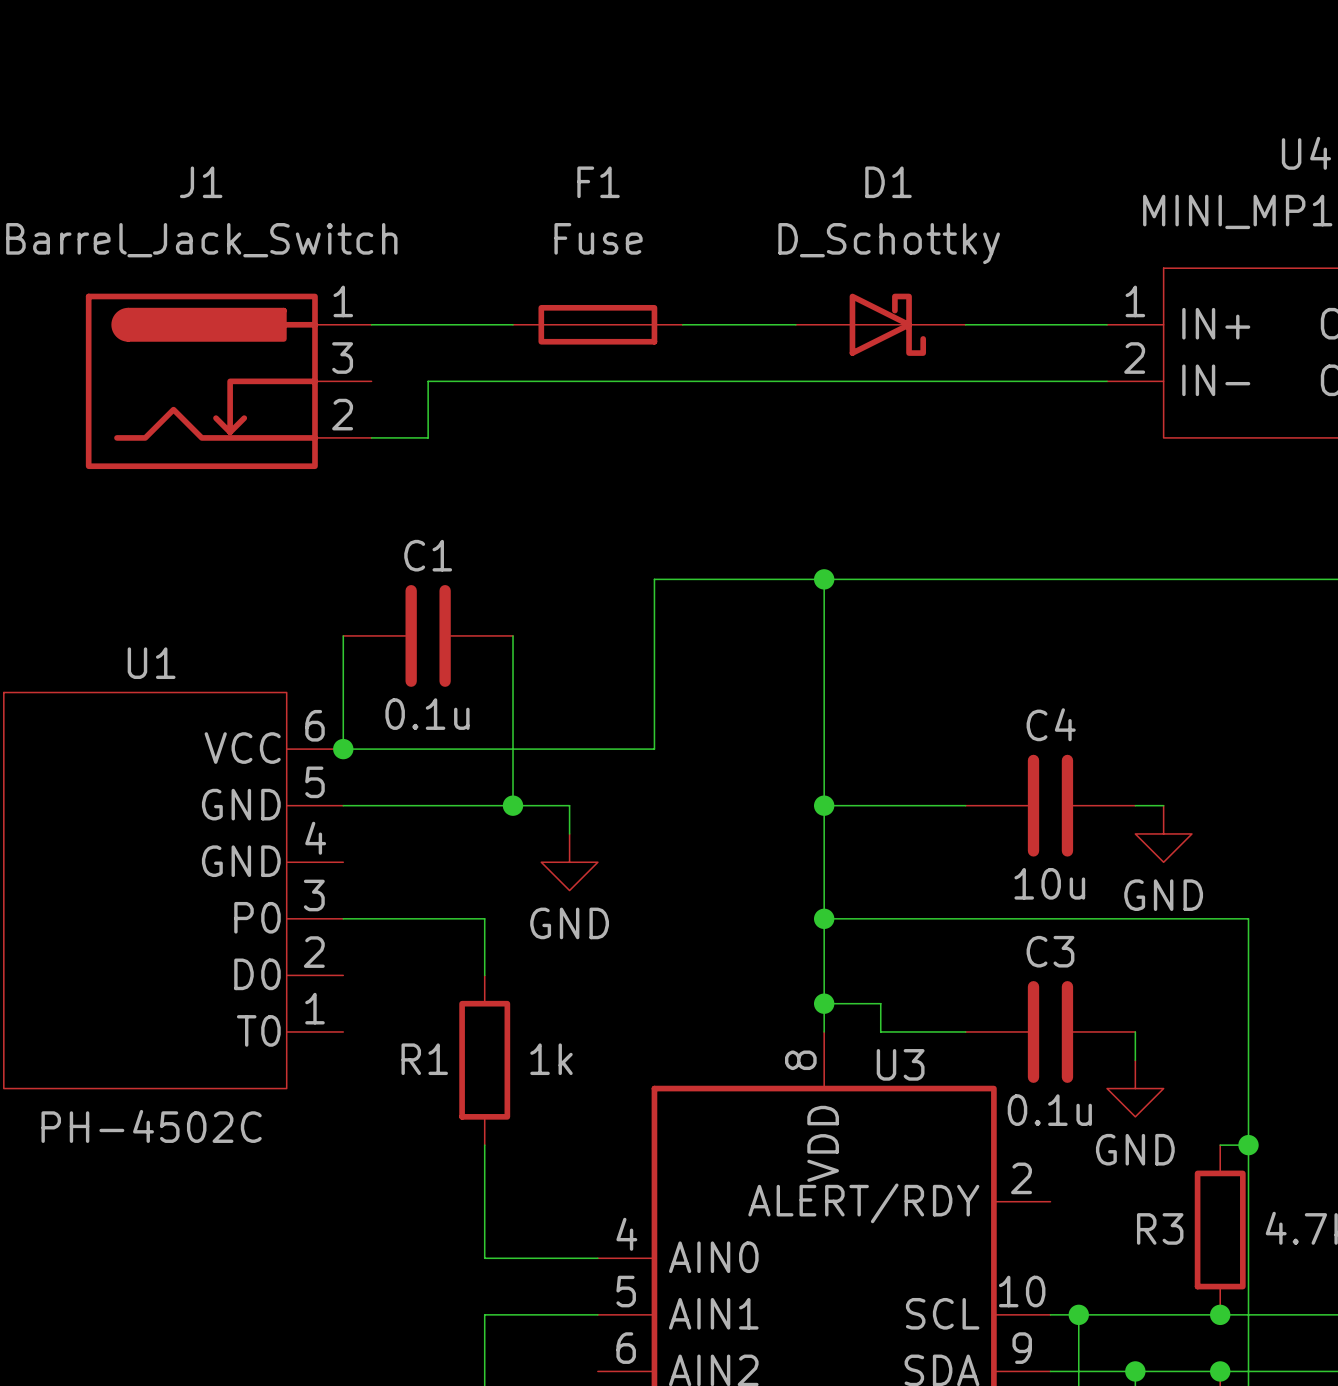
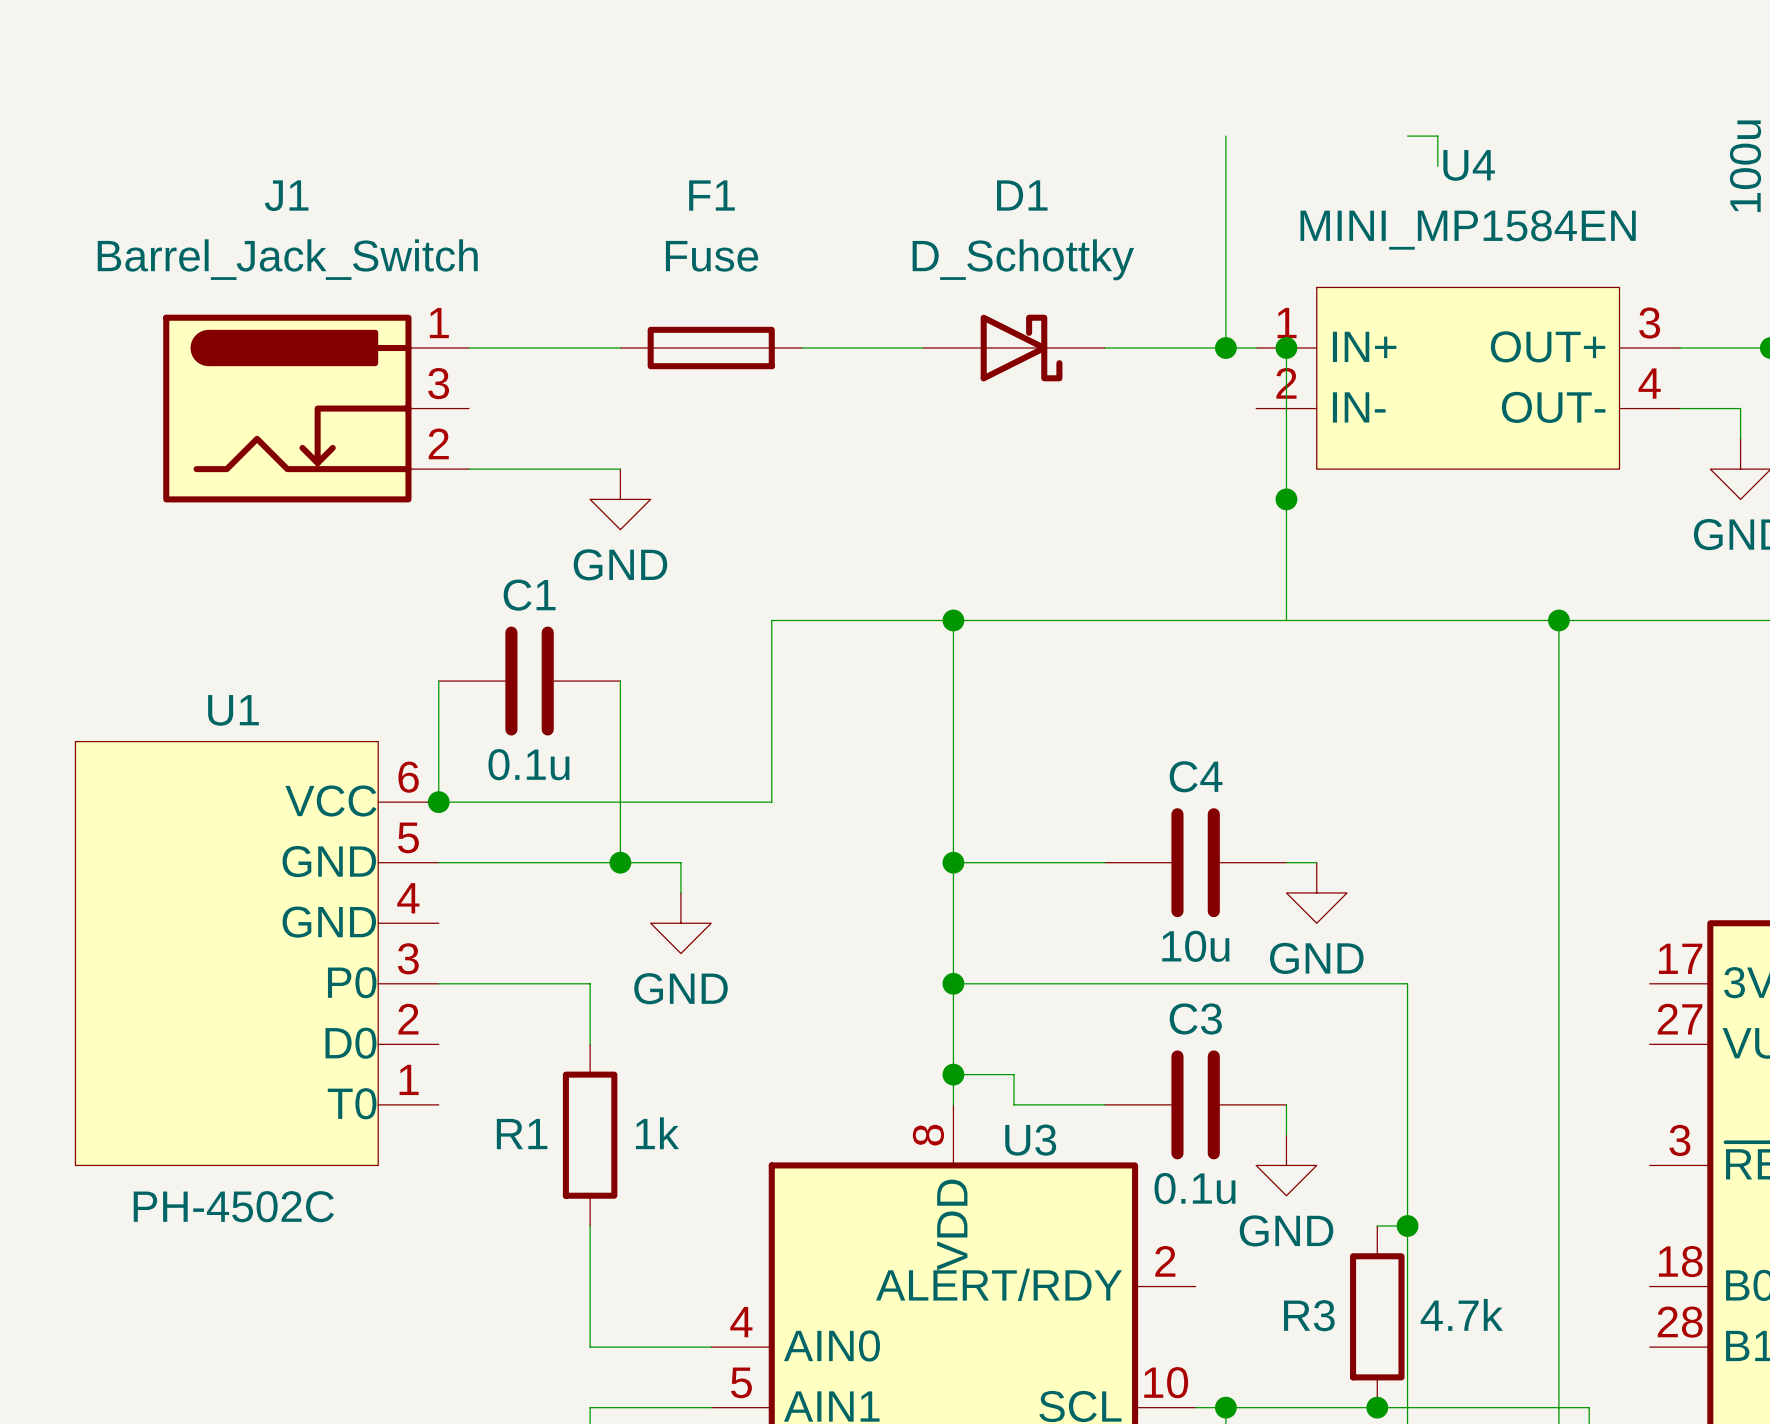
wire: none -> (1225, 136) (1225, 348)
wire: none -> (1407, 136) (1437, 136) (1437, 166)
junction: none -> (1225, 348)
wire: none -> (1286, 348) (1286, 620)
junction: none -> (1286, 348)
wire: (1107, 381) (428, 381) (428, 437) -> (620, 469) (529, 469)
power symbol: none -> GND (620, 499)
junction: none -> (1286, 499)

